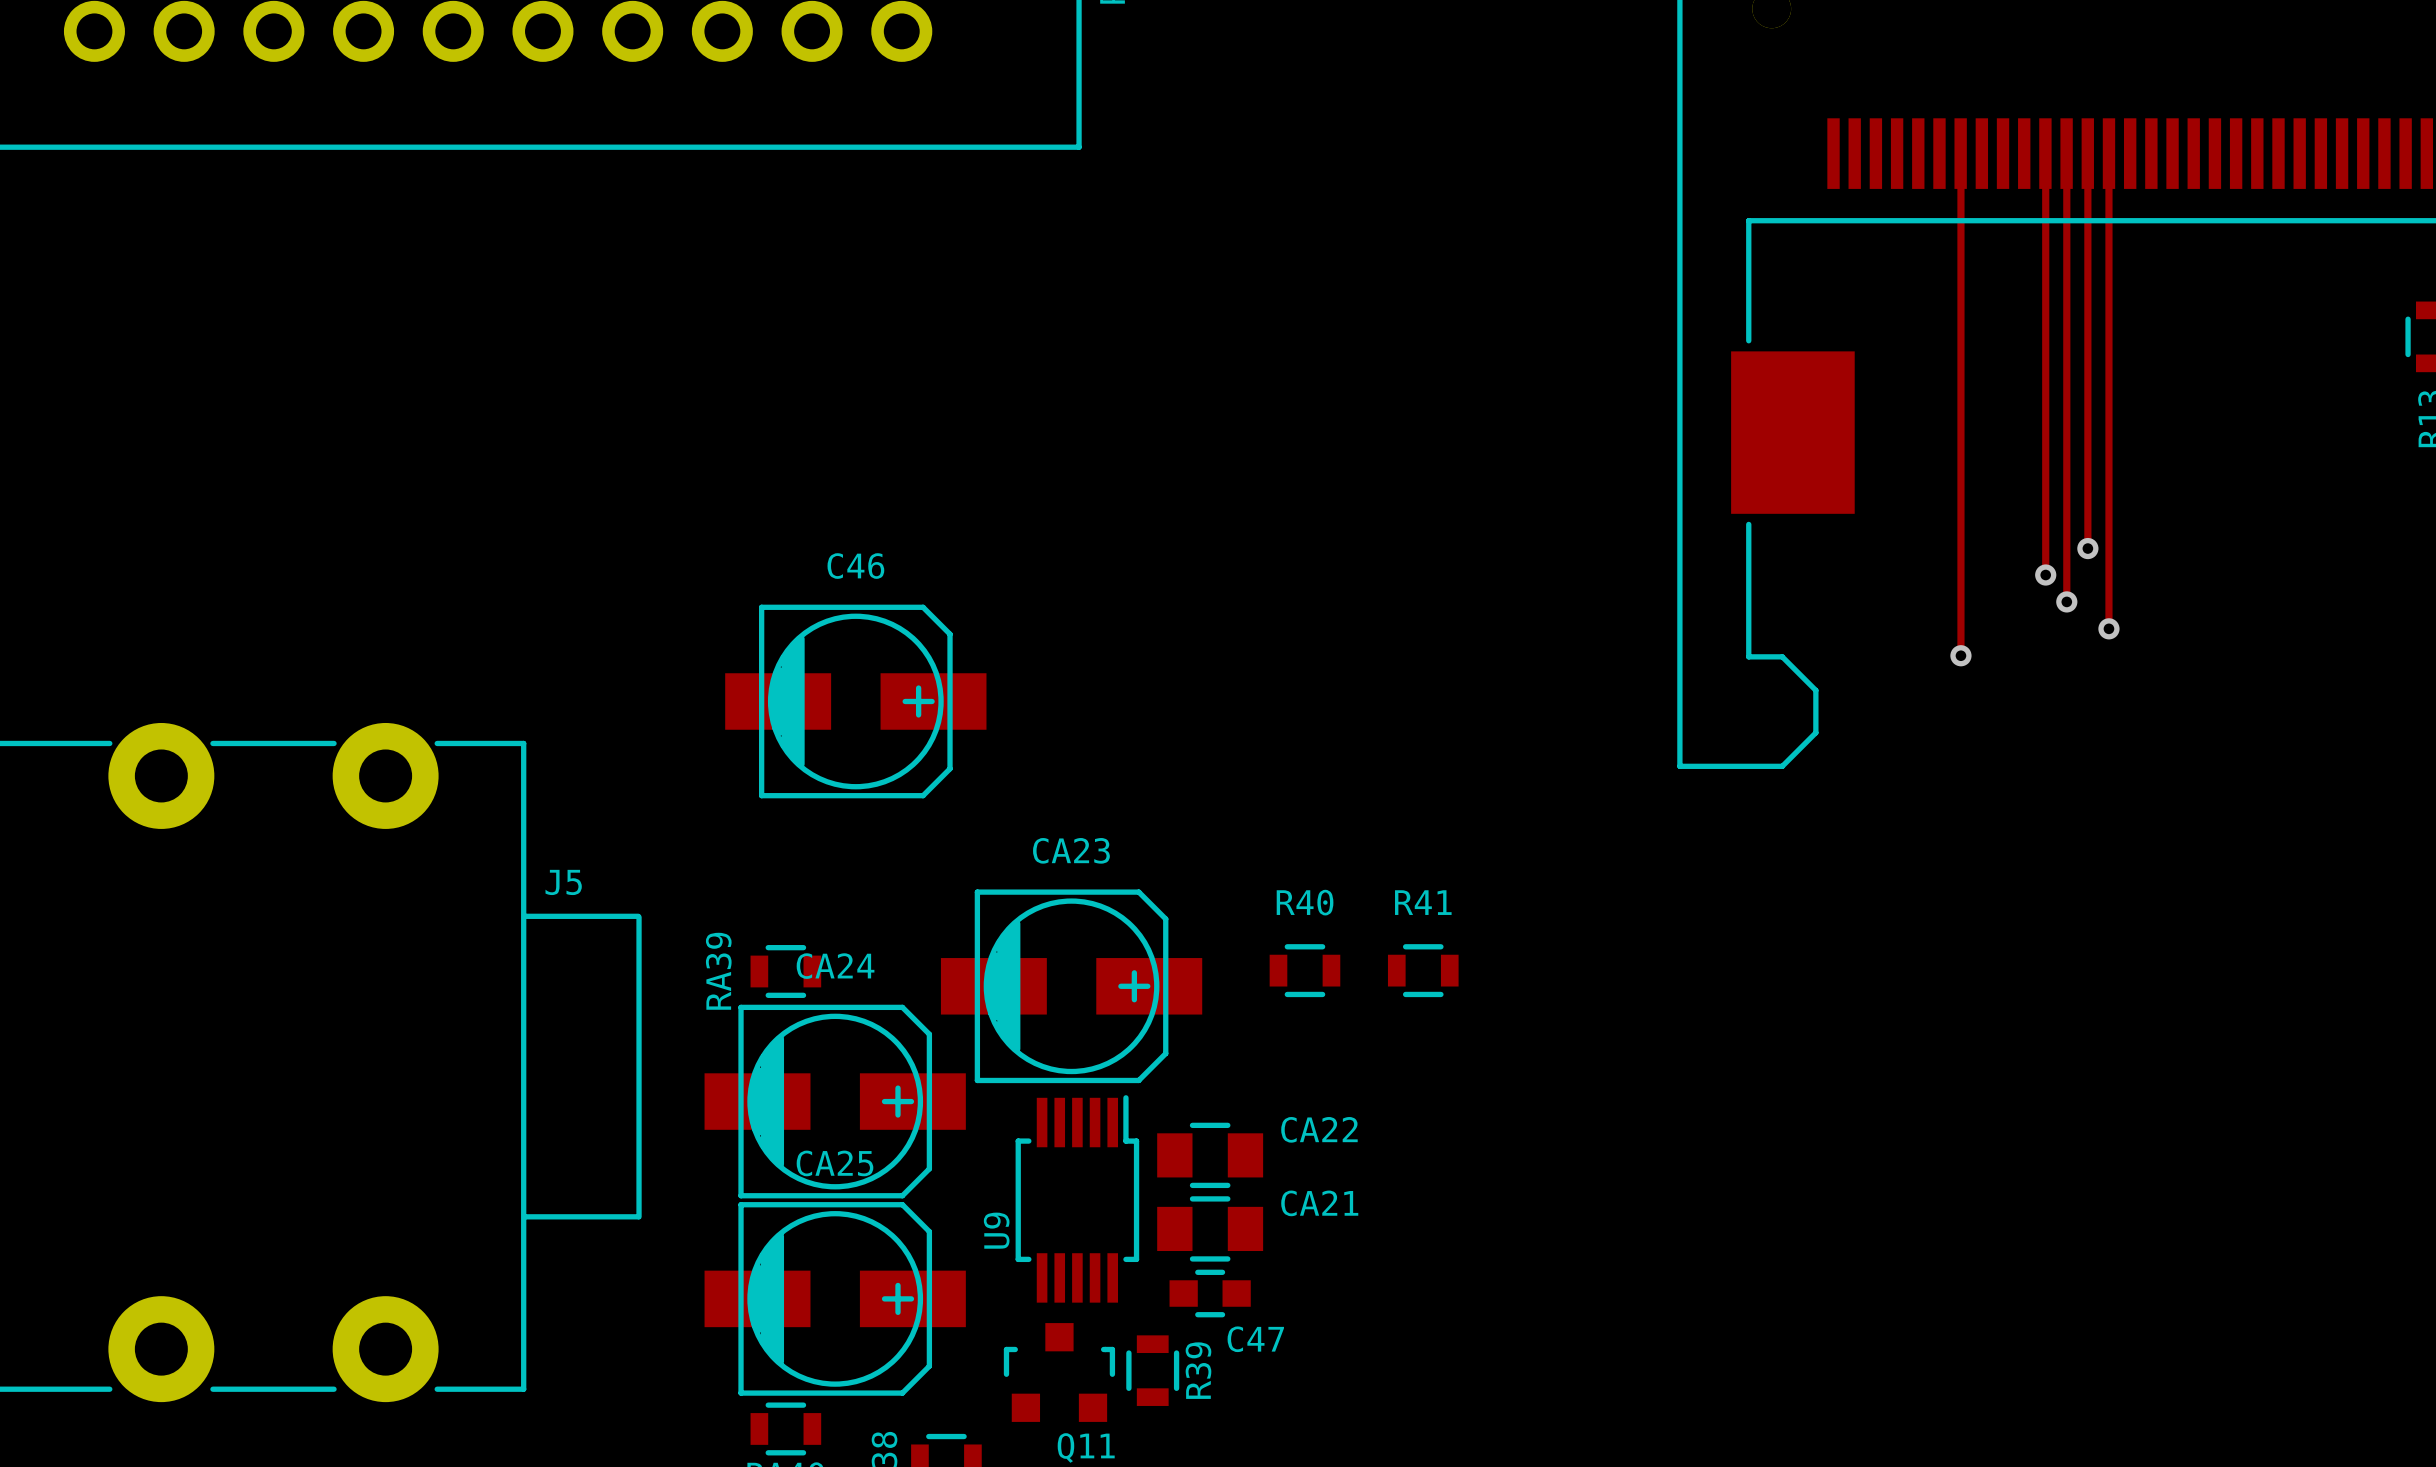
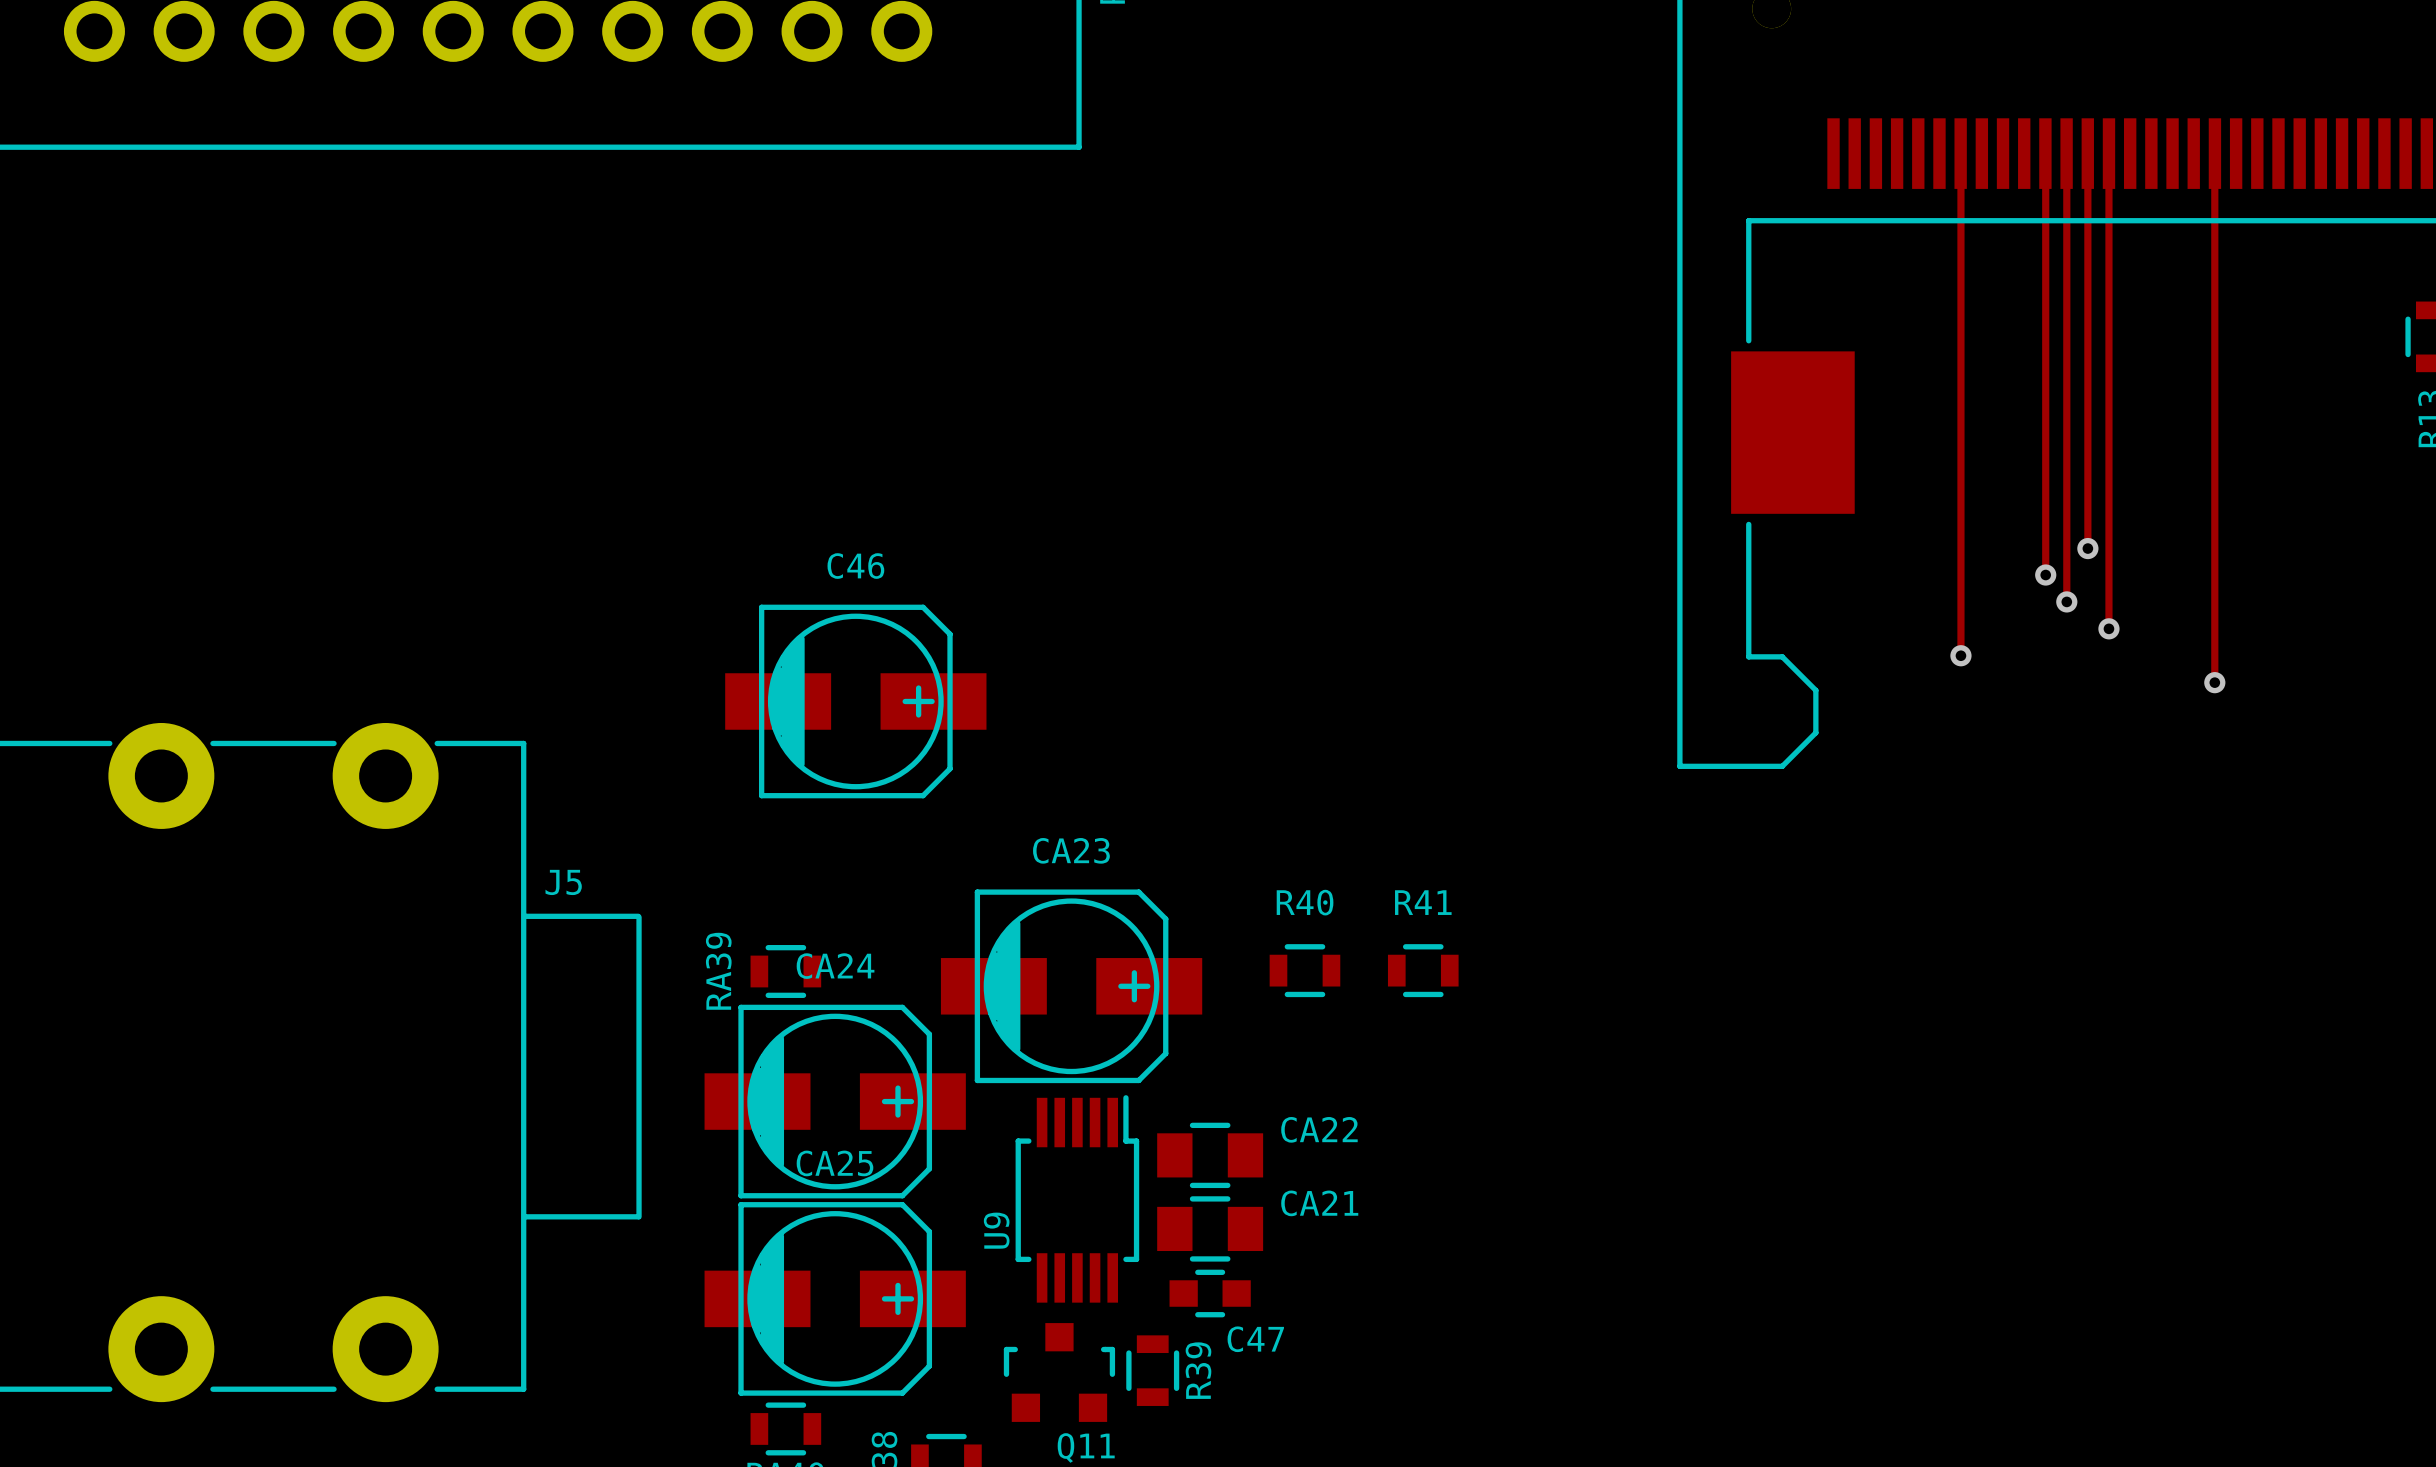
track: none -> (2214, 153) (2214, 682)
via: none -> (2214, 682)

